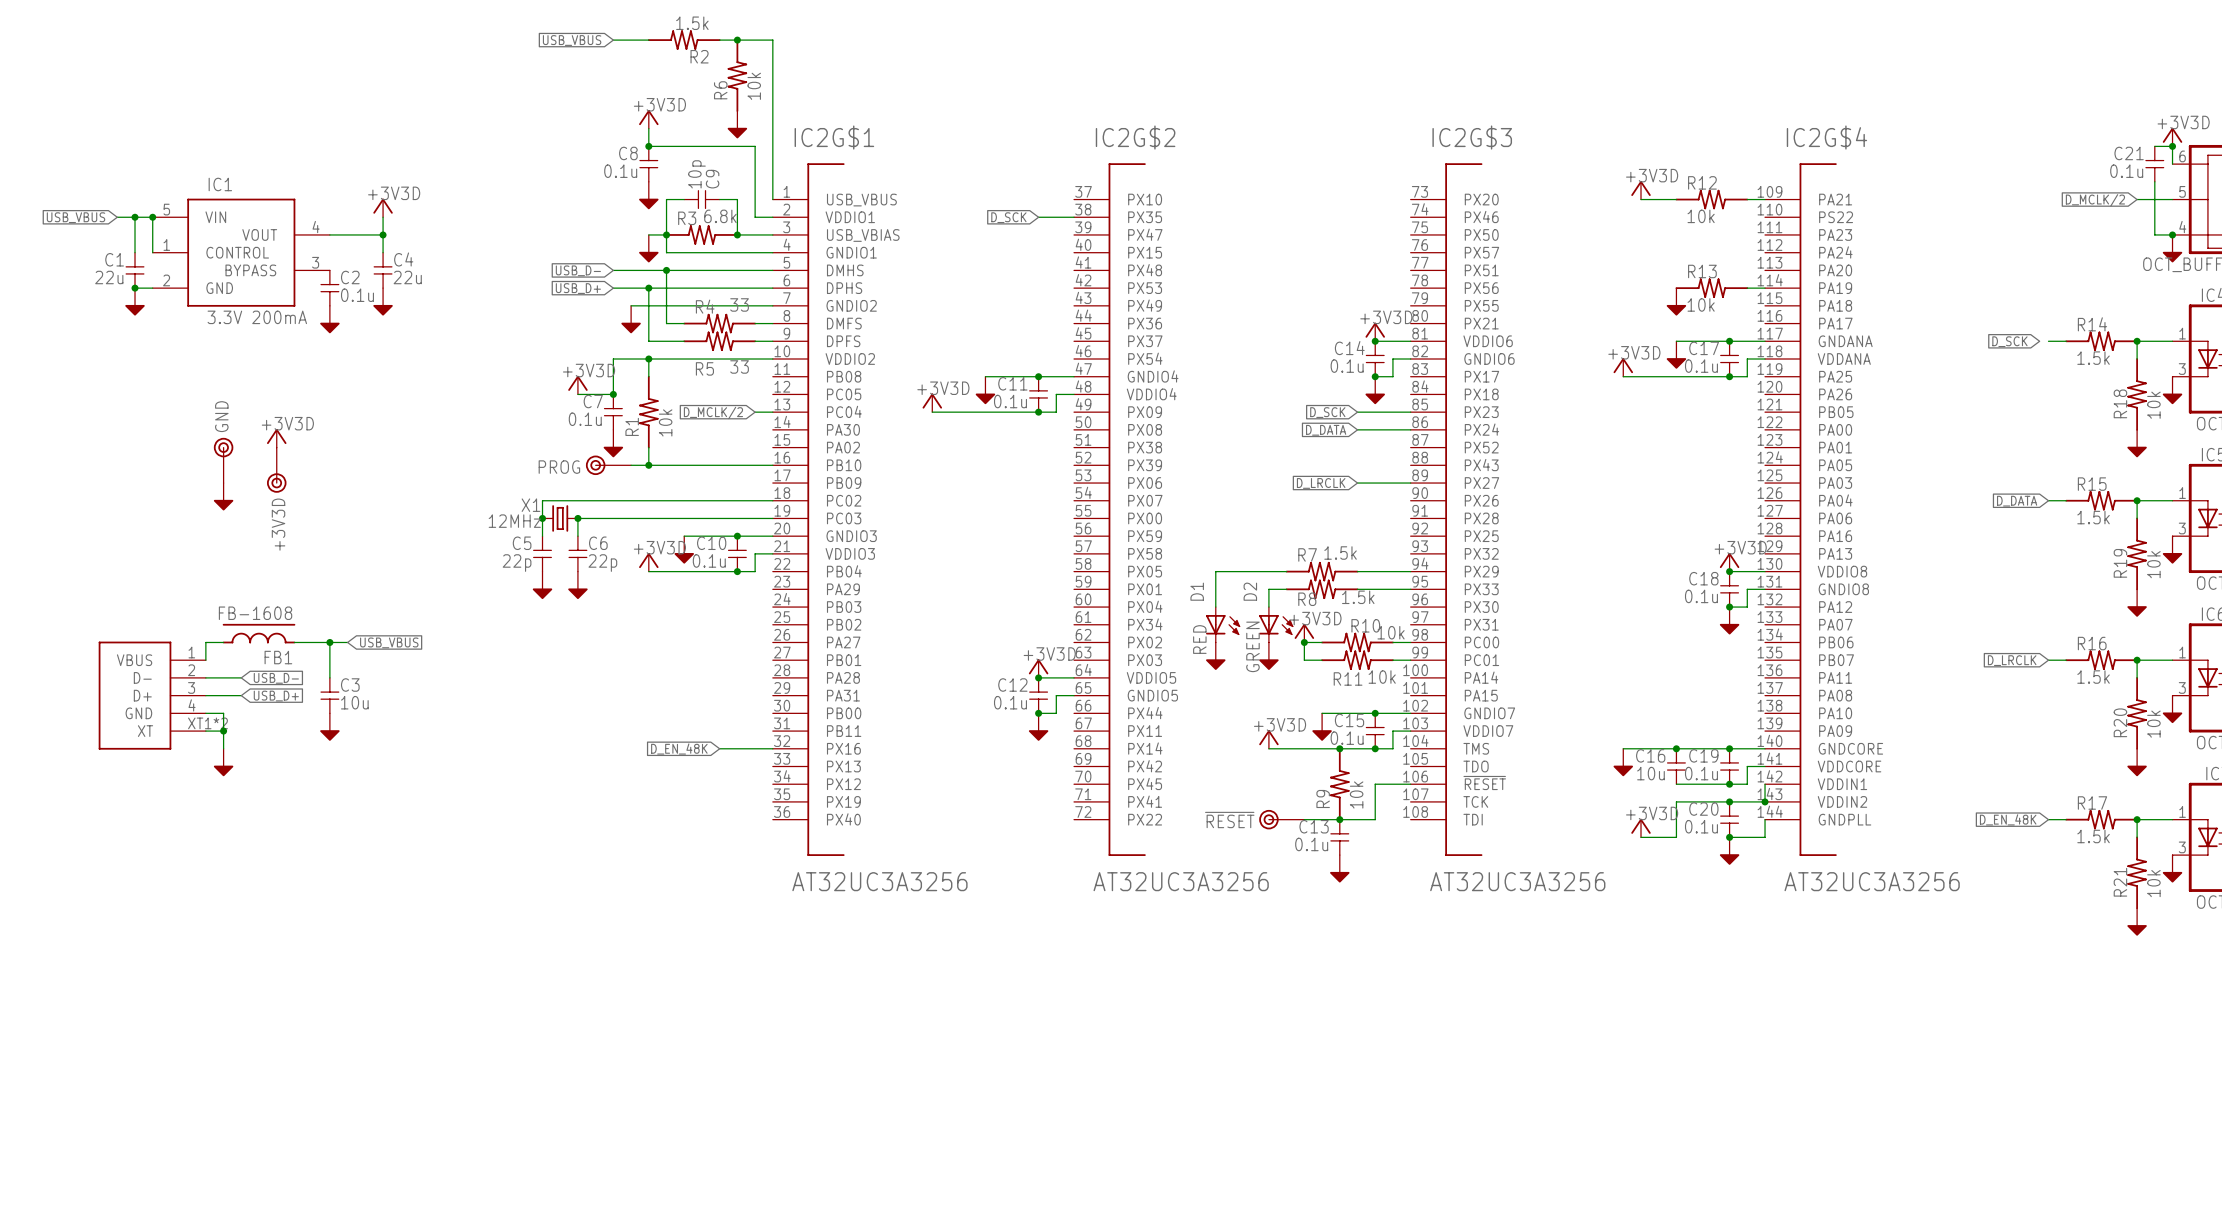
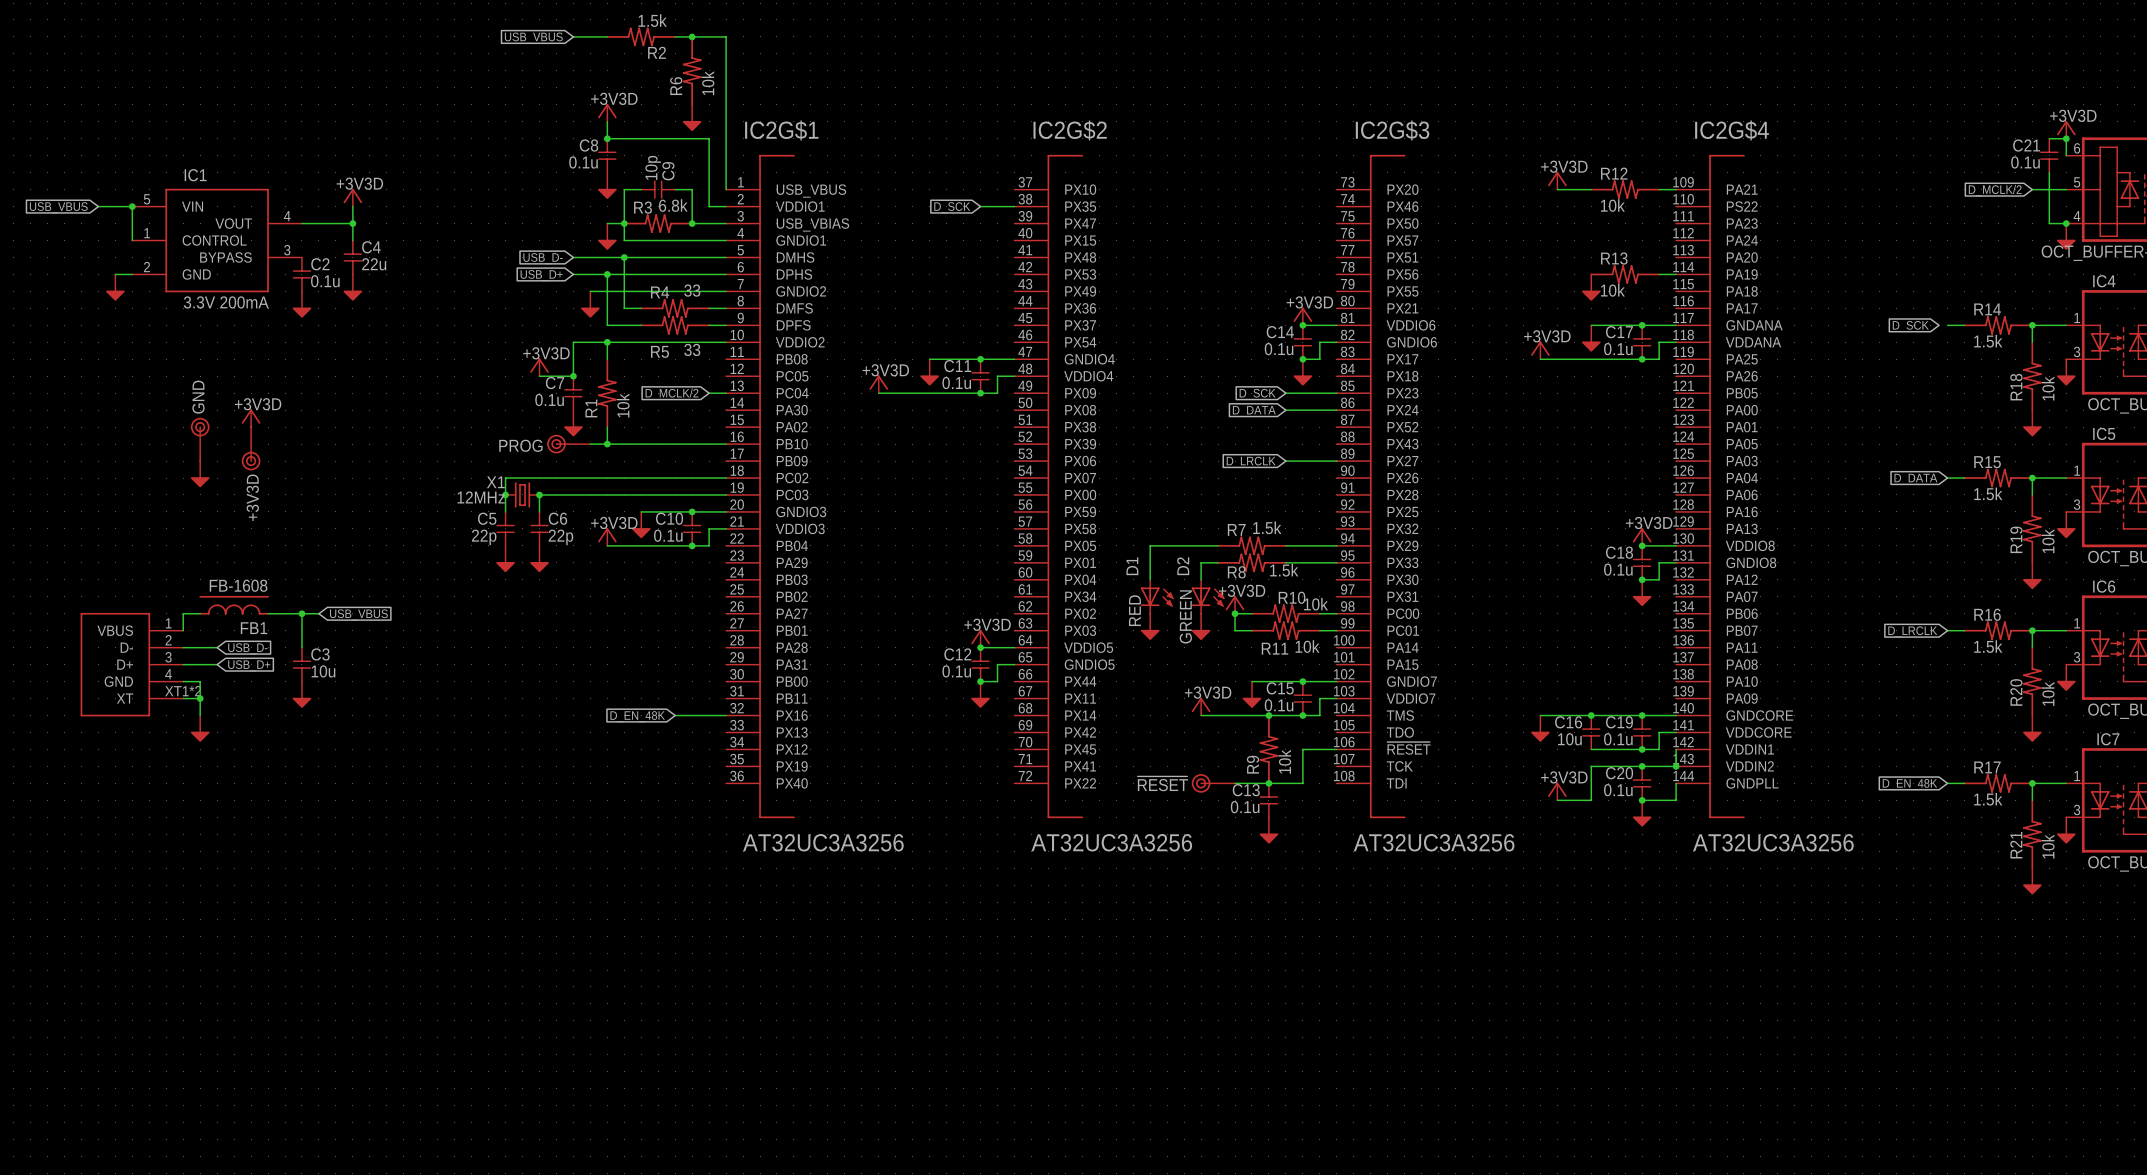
wire: (135, 217) (135, 252) -> none
junction: (135, 217) -> none
C1: 22u (135, 270) -> none
junction: (135, 288) -> none

